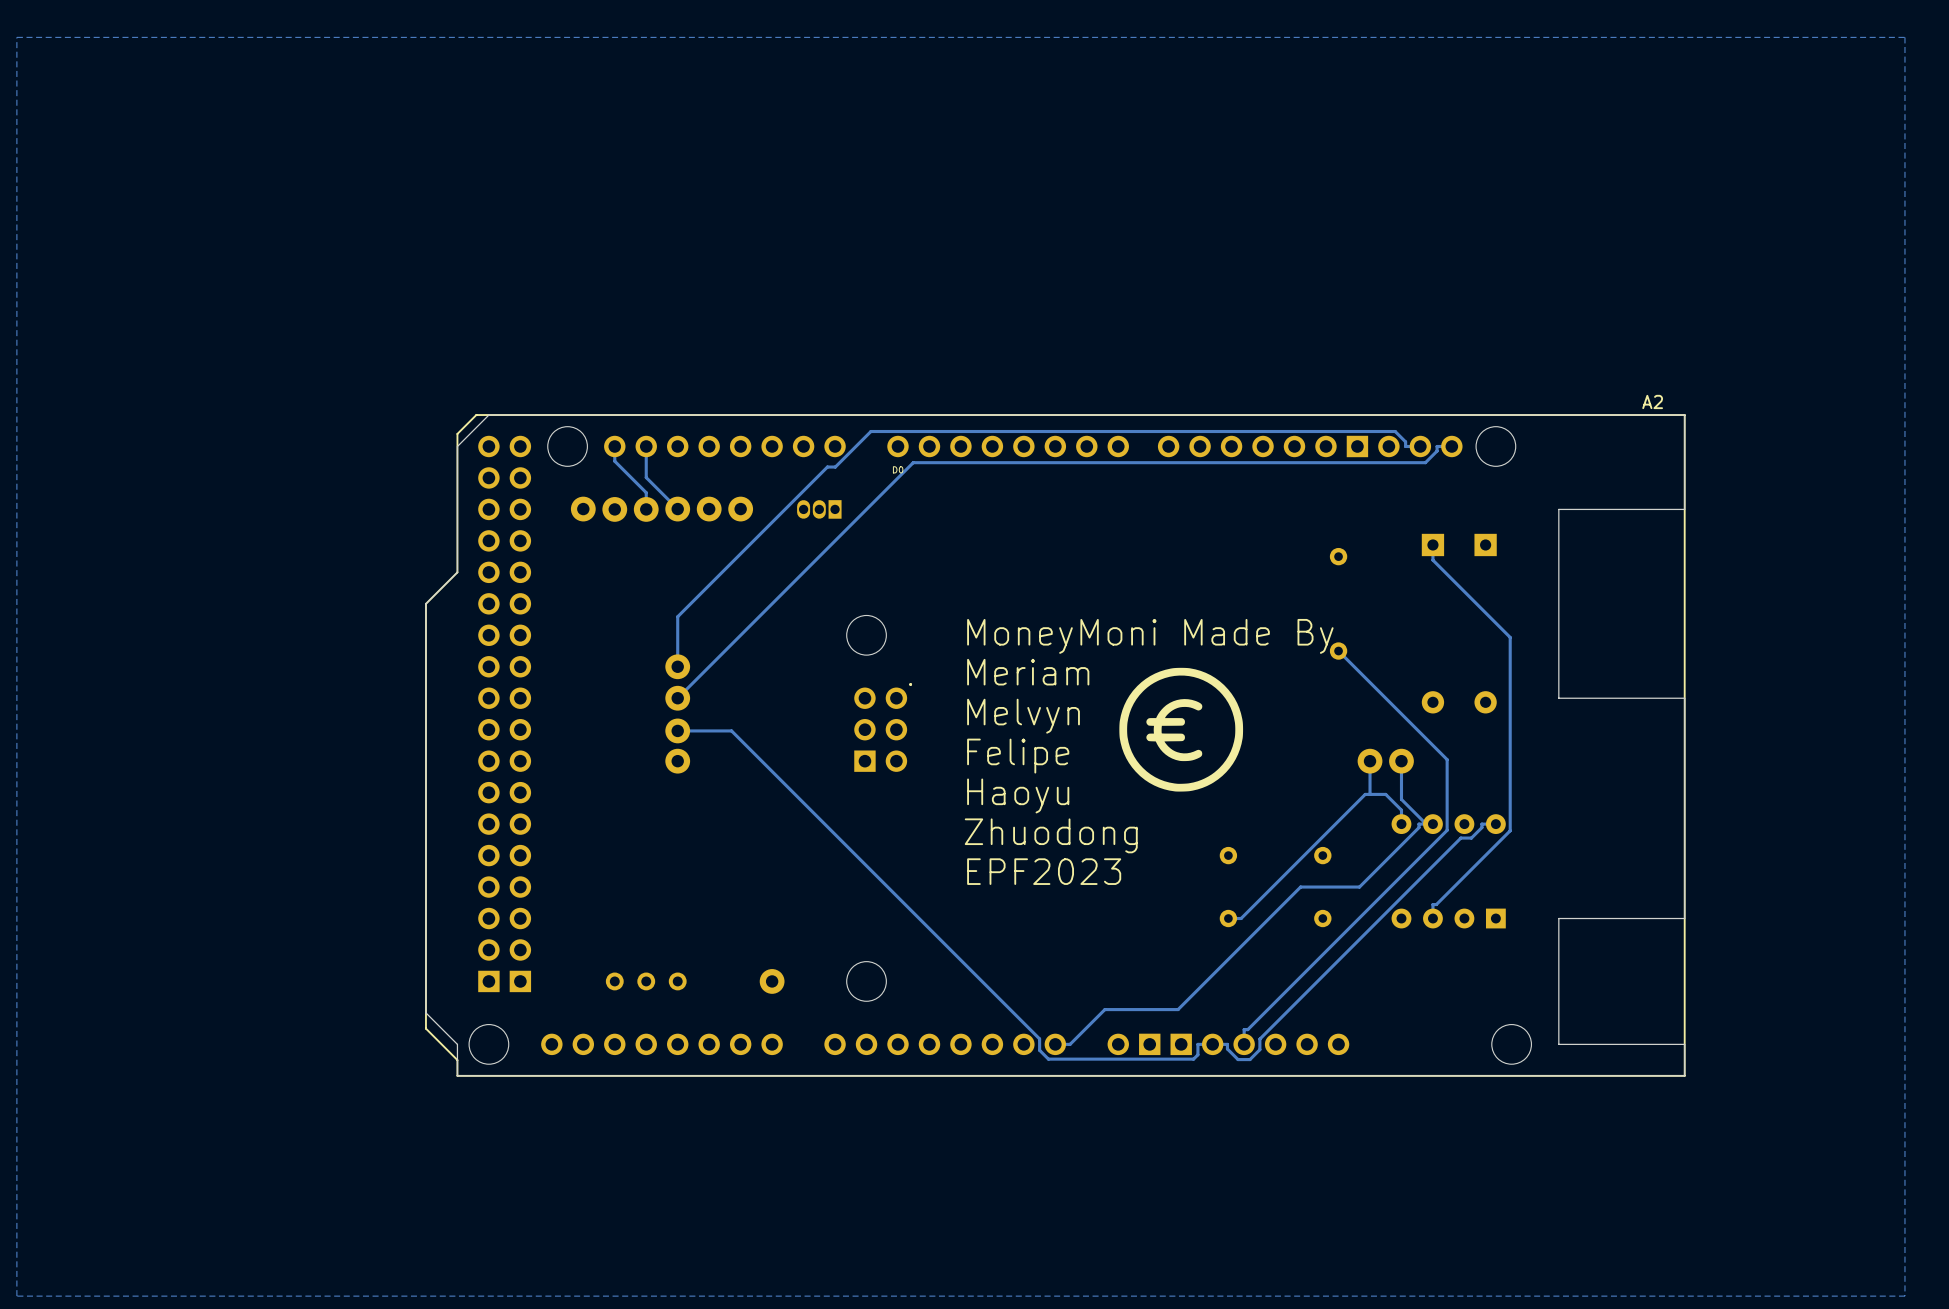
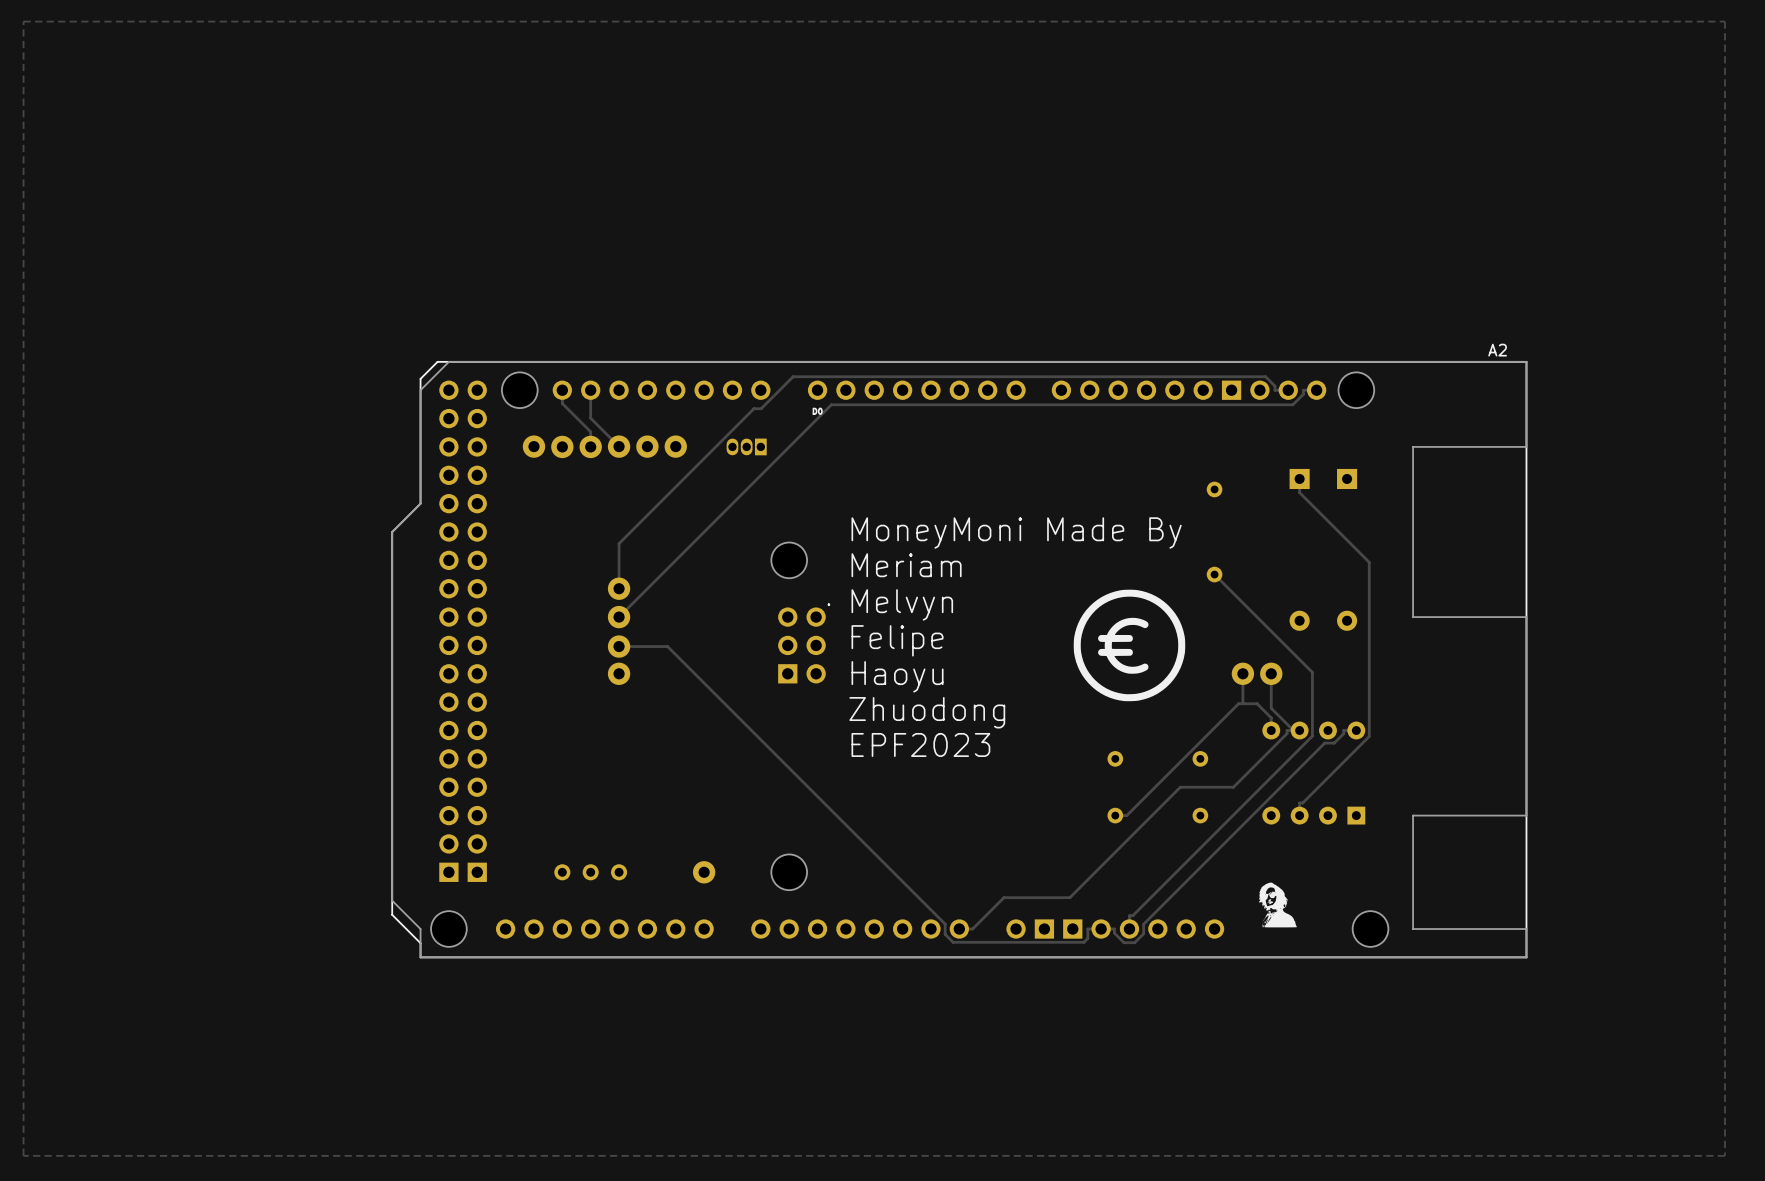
text position: MoneyMoni Made By (1150, 636) -> MoneyMoni Made By (1016, 533)
text position: Meriam (1028, 672) -> Meriam (906, 565)
text position: Melvyn (1023, 716) -> Melvyn (902, 604)
drawing position: (1181, 729) -> (1129, 645)
text position: Felipe (1018, 756) -> Felipe (897, 640)
text position: Haoyu (1018, 795) -> Haoyu (897, 676)
text position: Zhuodong (1051, 835) -> Zhuodong (927, 712)
text position: EPF2023 (1044, 871) -> EPF2023 (920, 744)
drawing: none -> [1258, 882, 1297, 928]

